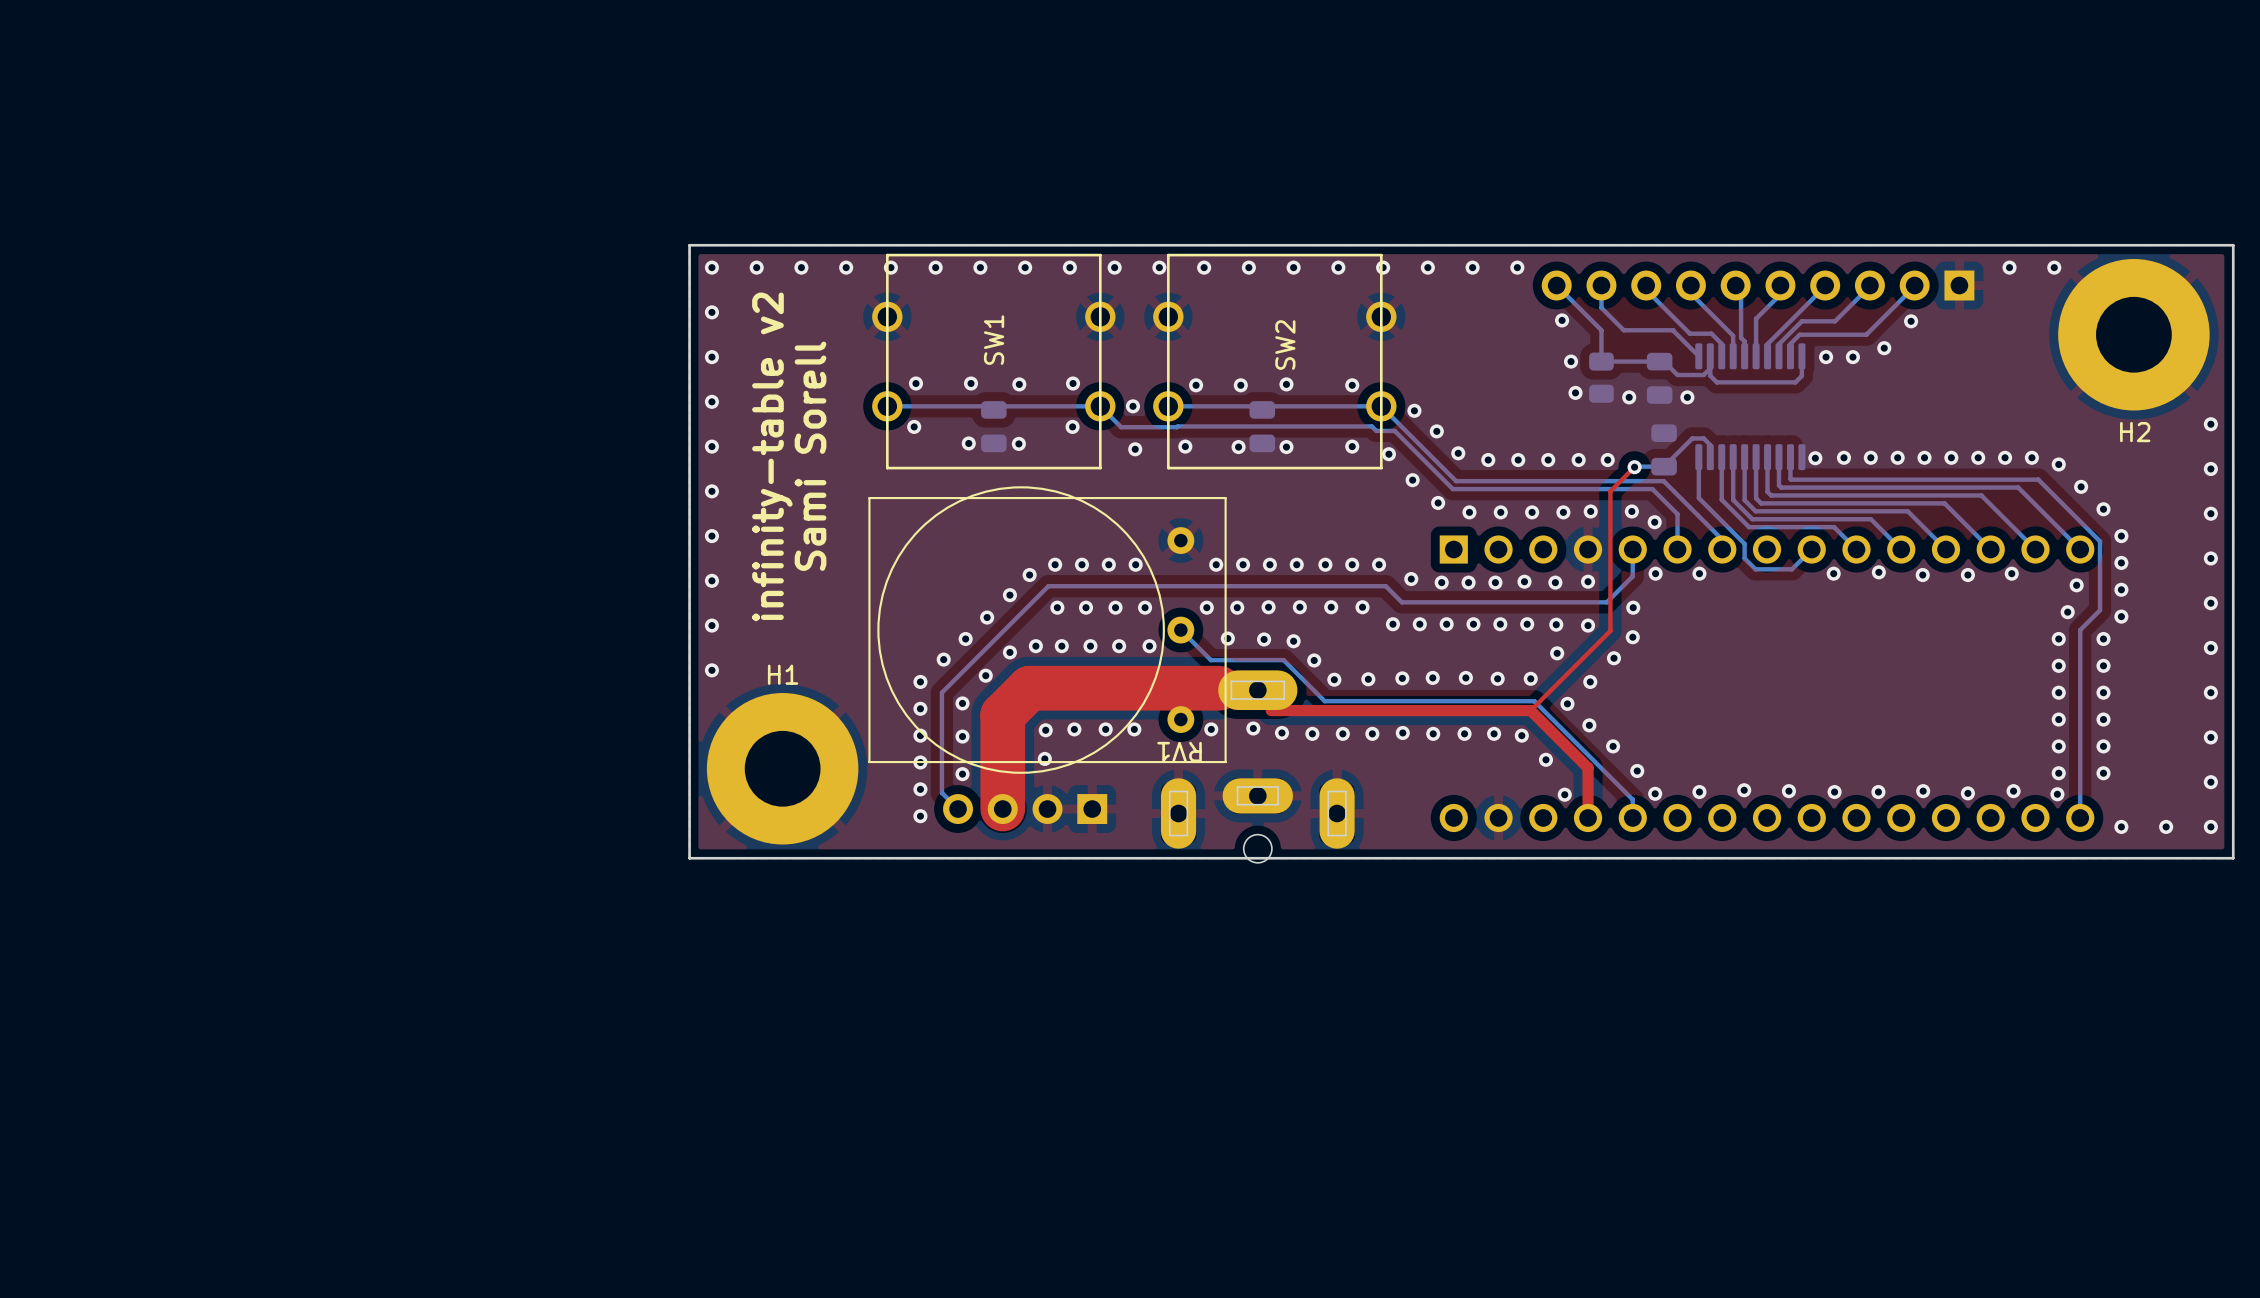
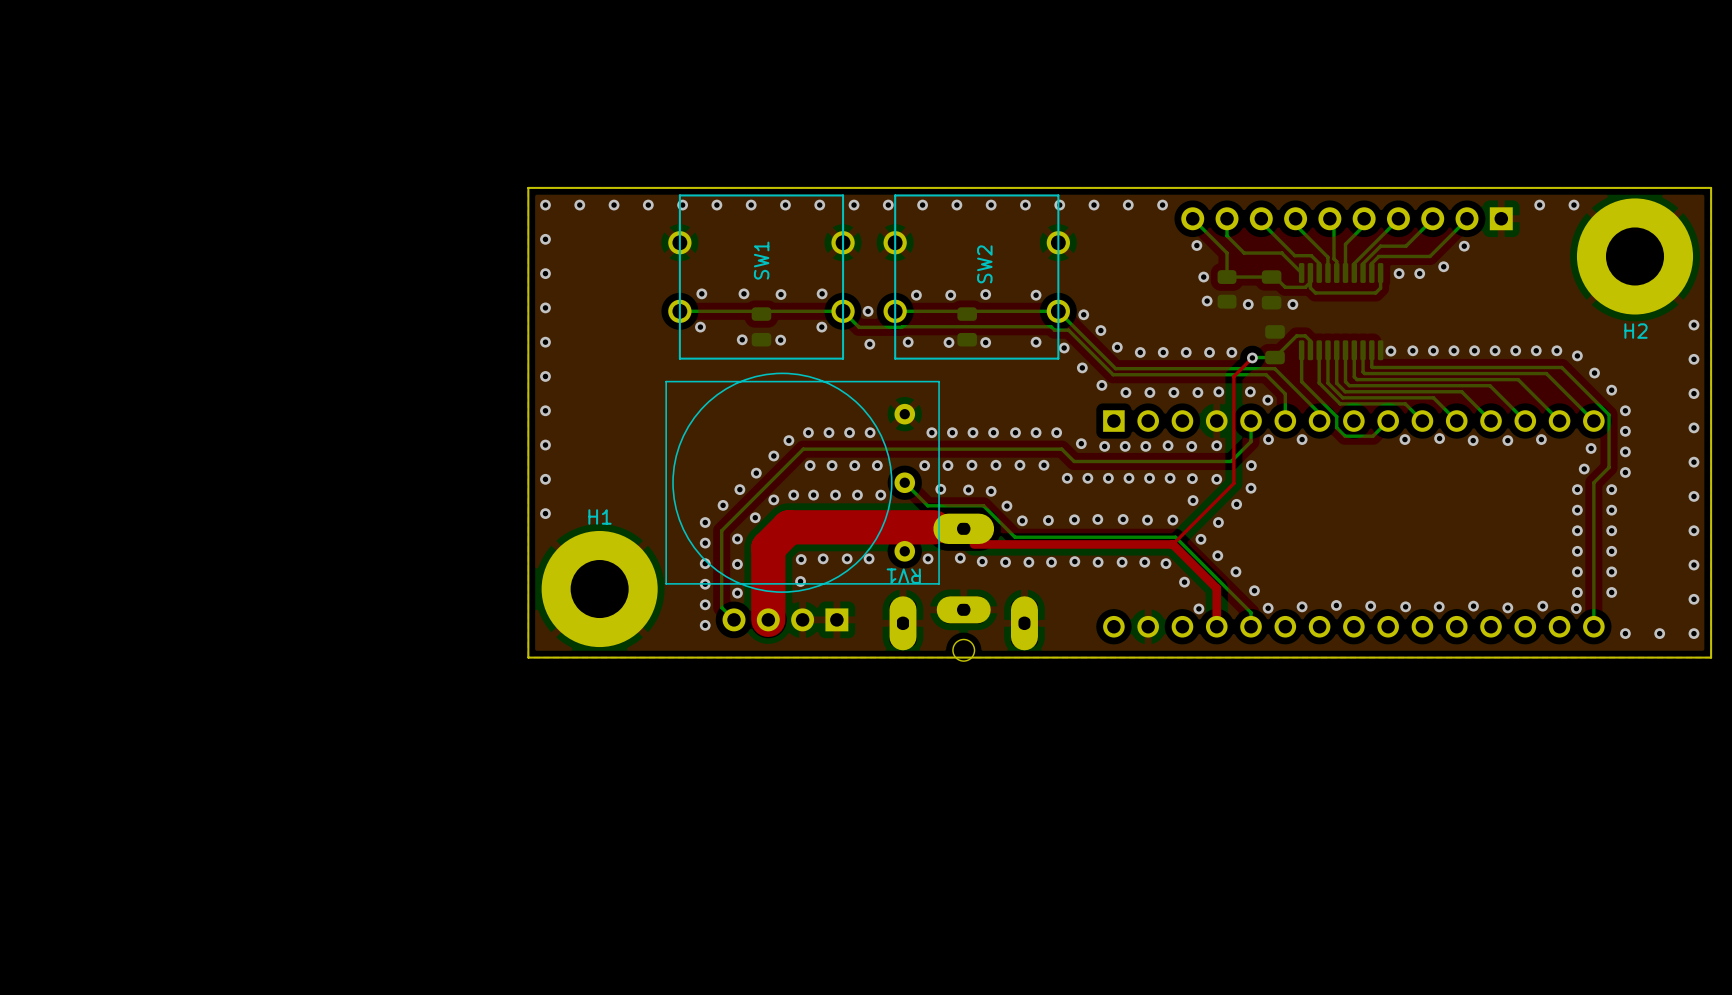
text: infinity-table v2 (772, 456) -> none
text: Sami Sorell (810, 456) -> none

